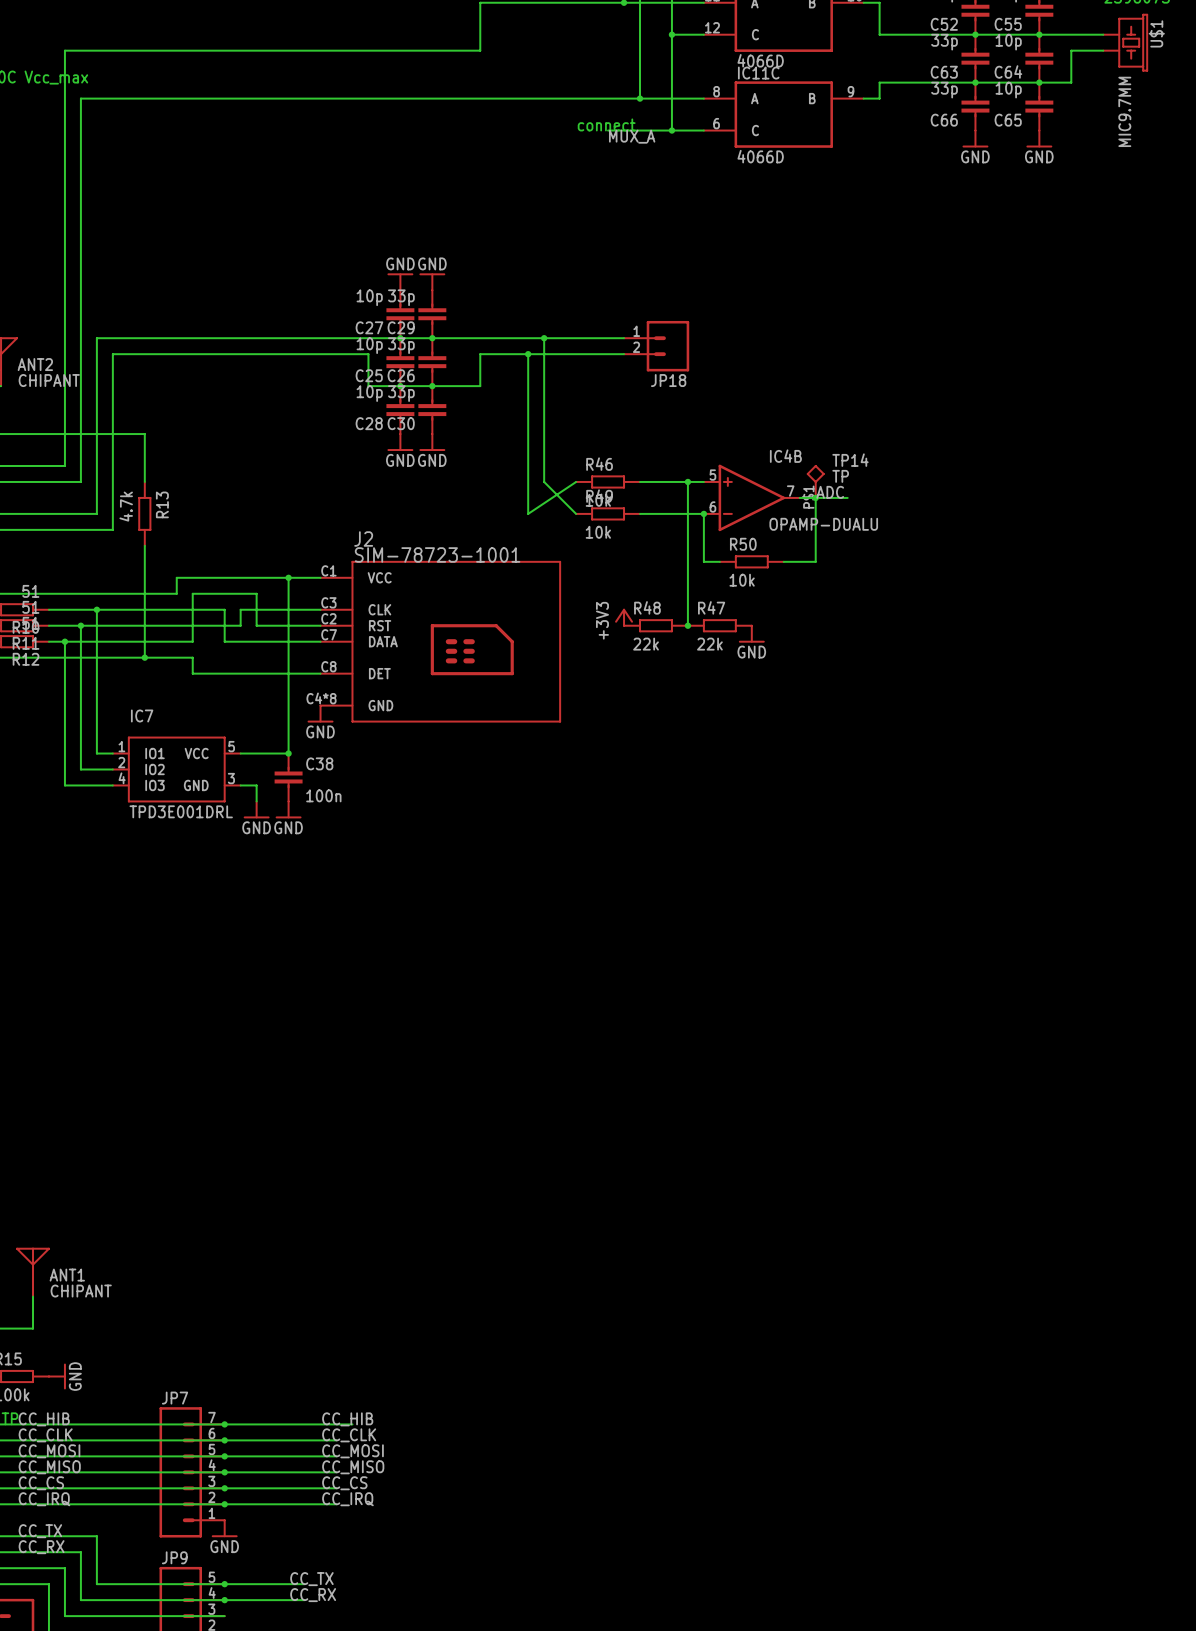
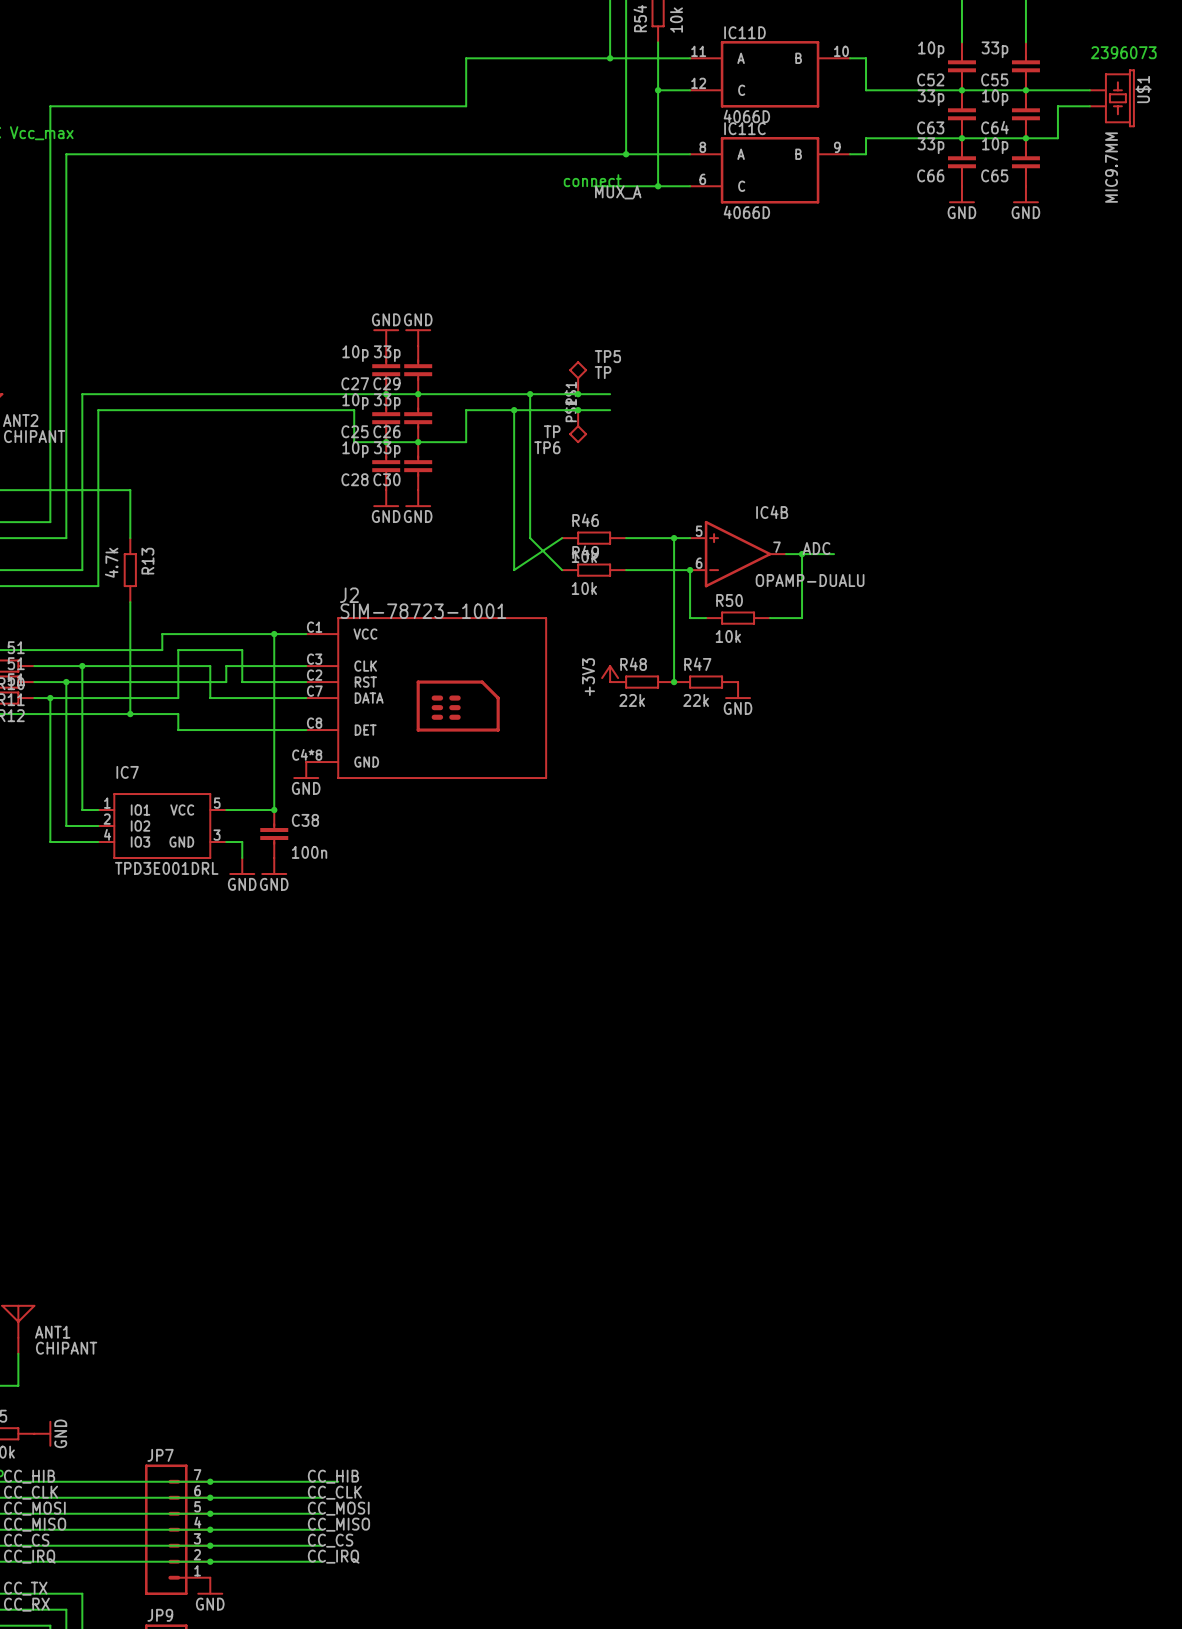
TP5: none -> TP (578, 377)
junction: none -> (578, 394)
JP18: (656, 346) -> none
junction: none -> (578, 410)
TP6: none -> TP (578, 426)
TP14: TP (815, 481) -> none

